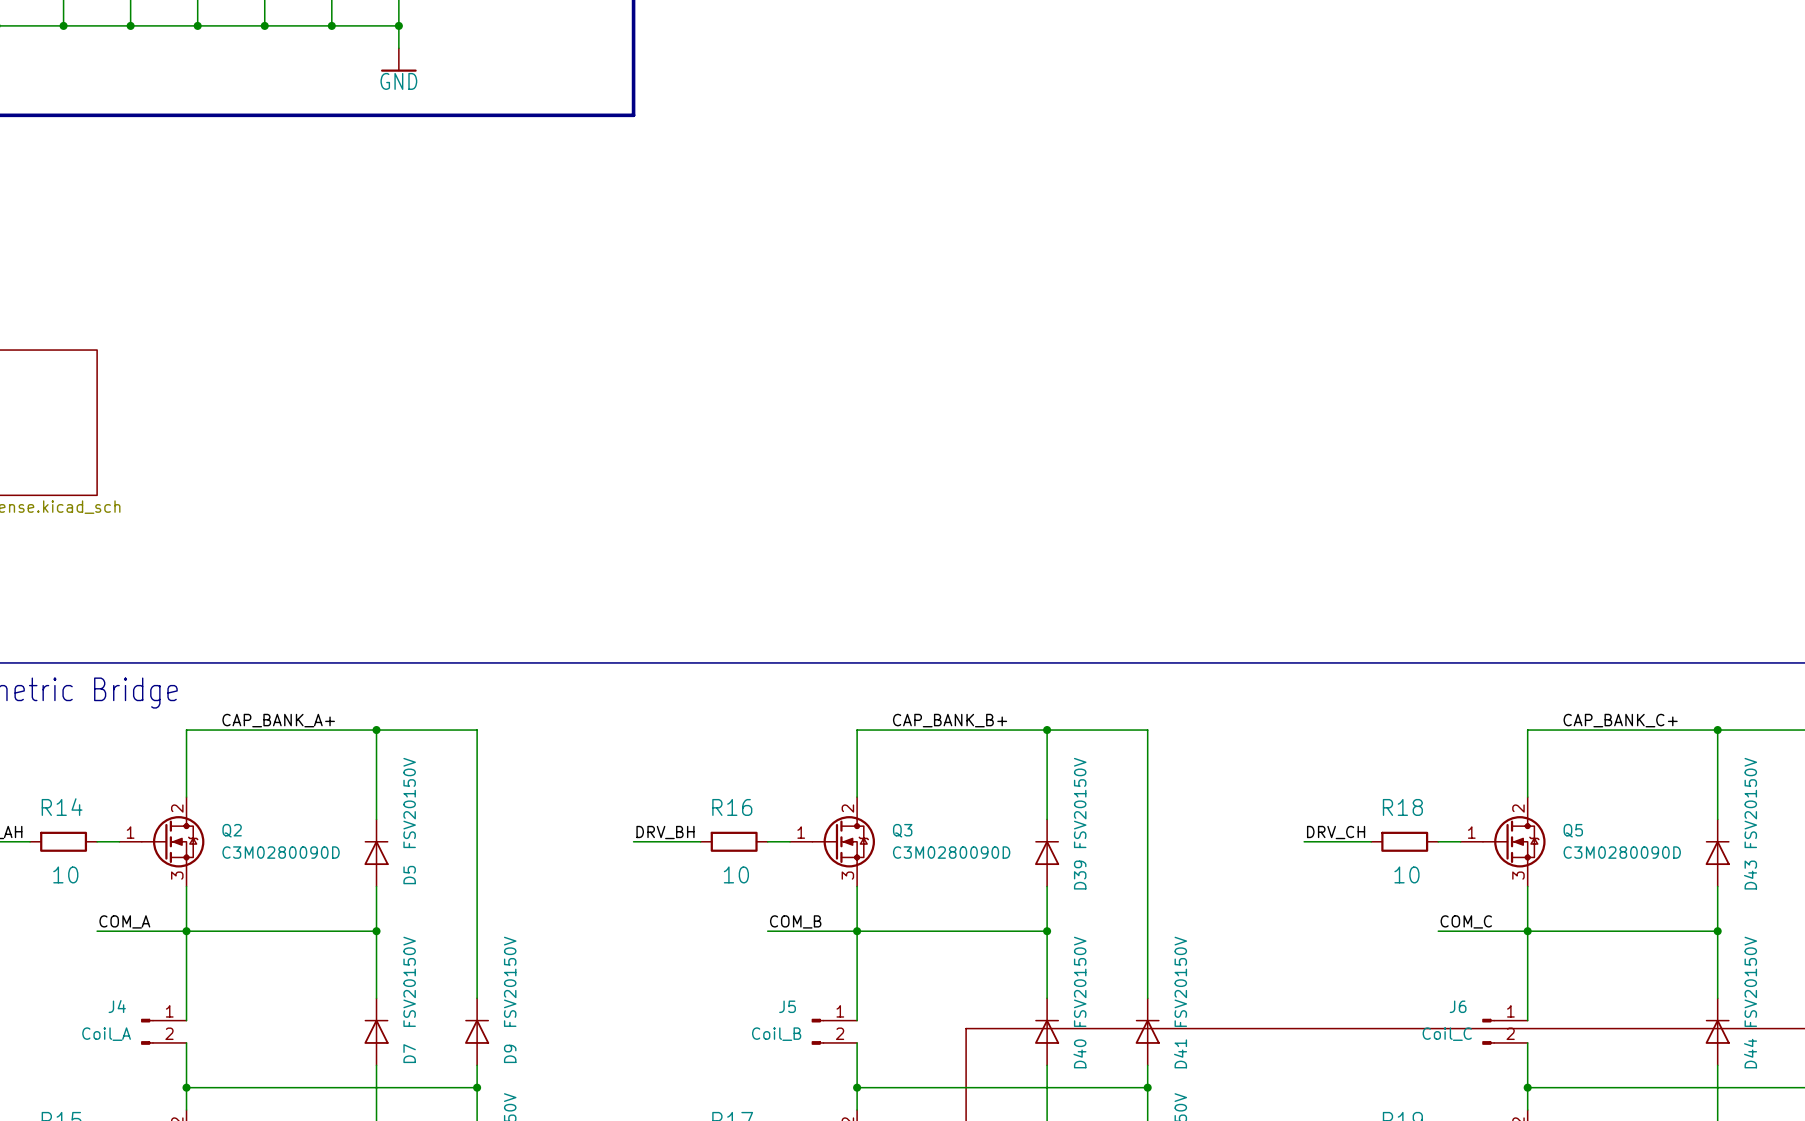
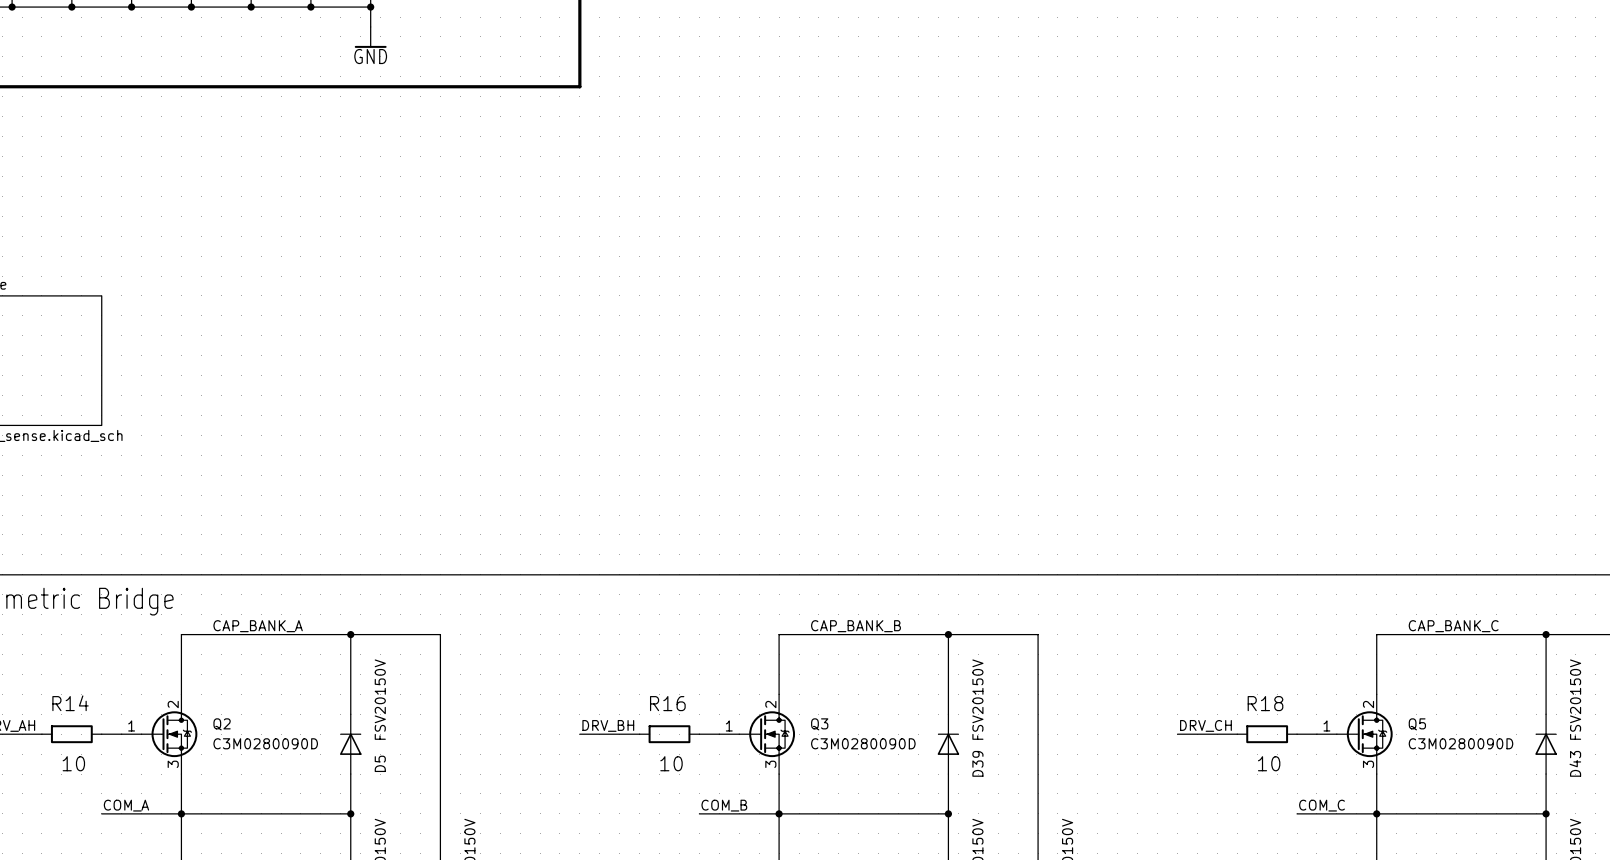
label: CAP_BANK_A+ (278, 720) -> CAP_BANK_A (258, 626)
label: CAP_BANK_B+ (950, 720) -> CAP_BANK_B (855, 626)
label: CAP_BANK_C+ (1620, 720) -> CAP_BANK_C (1453, 626)

